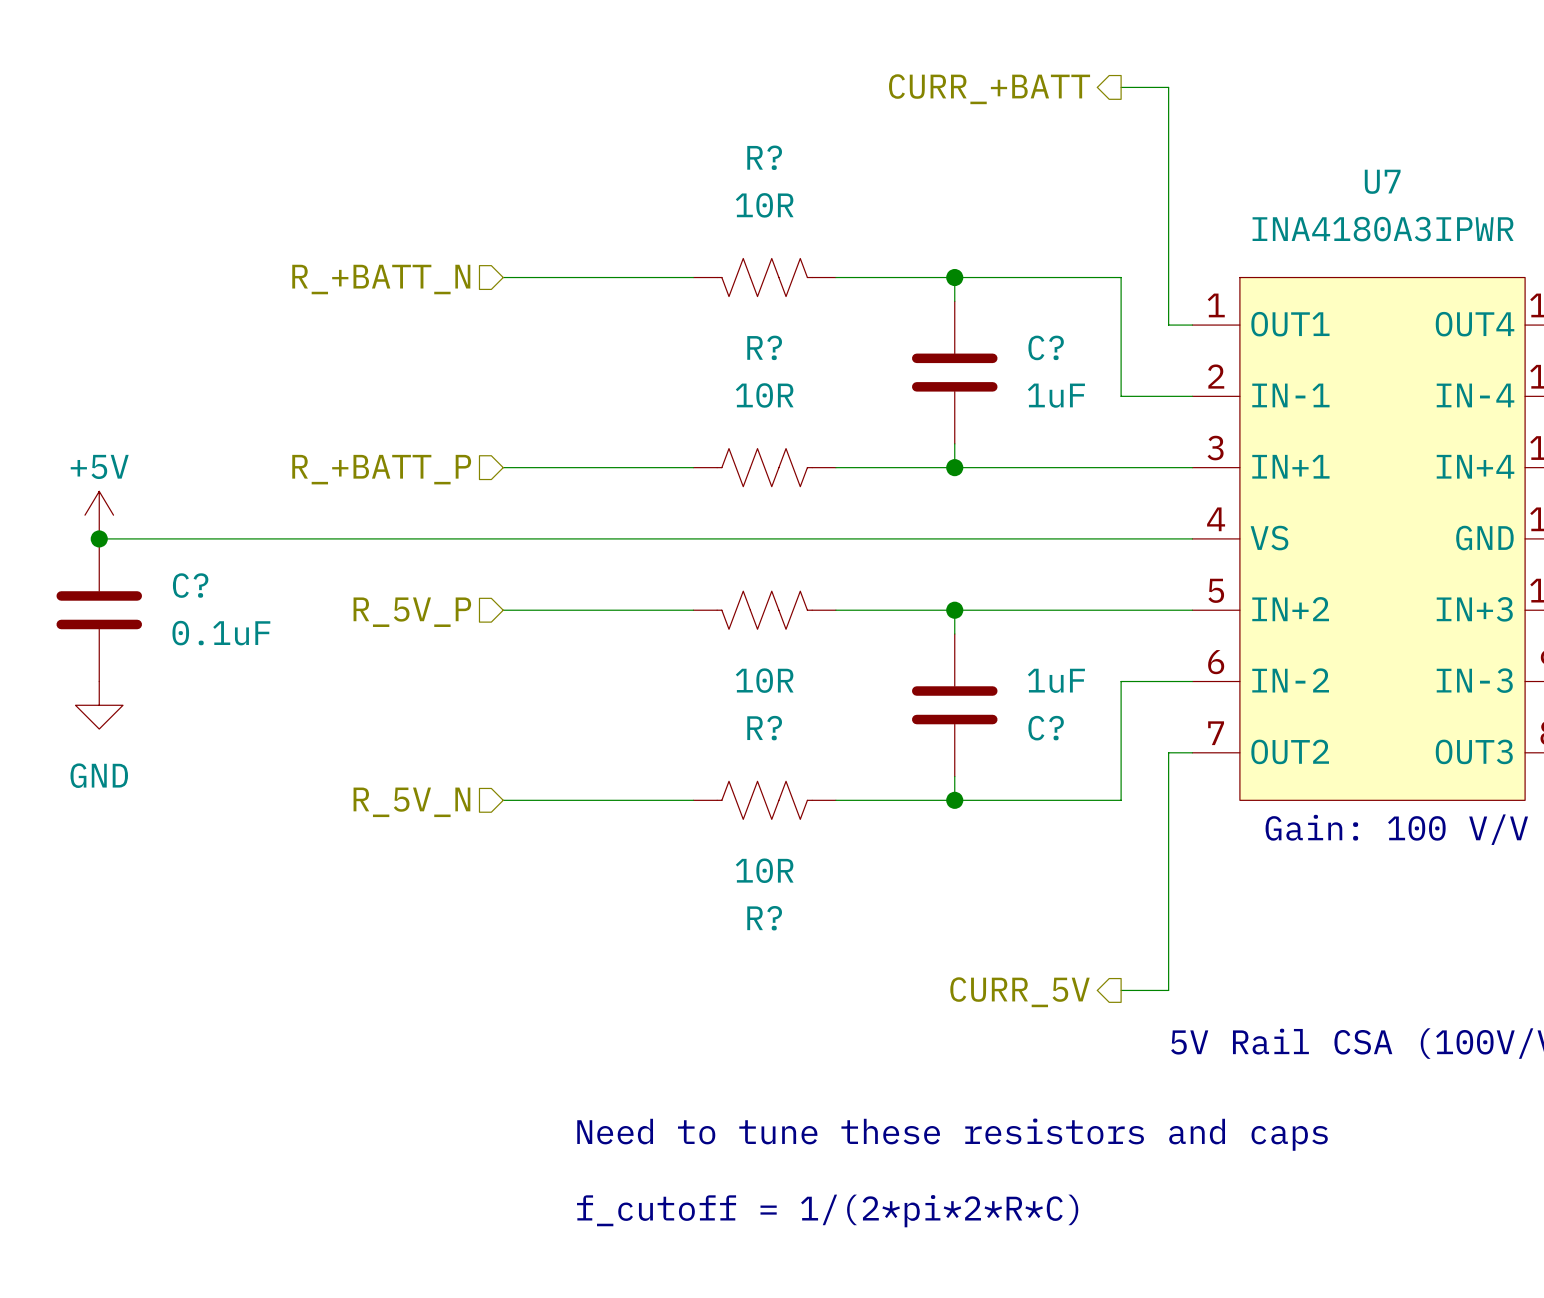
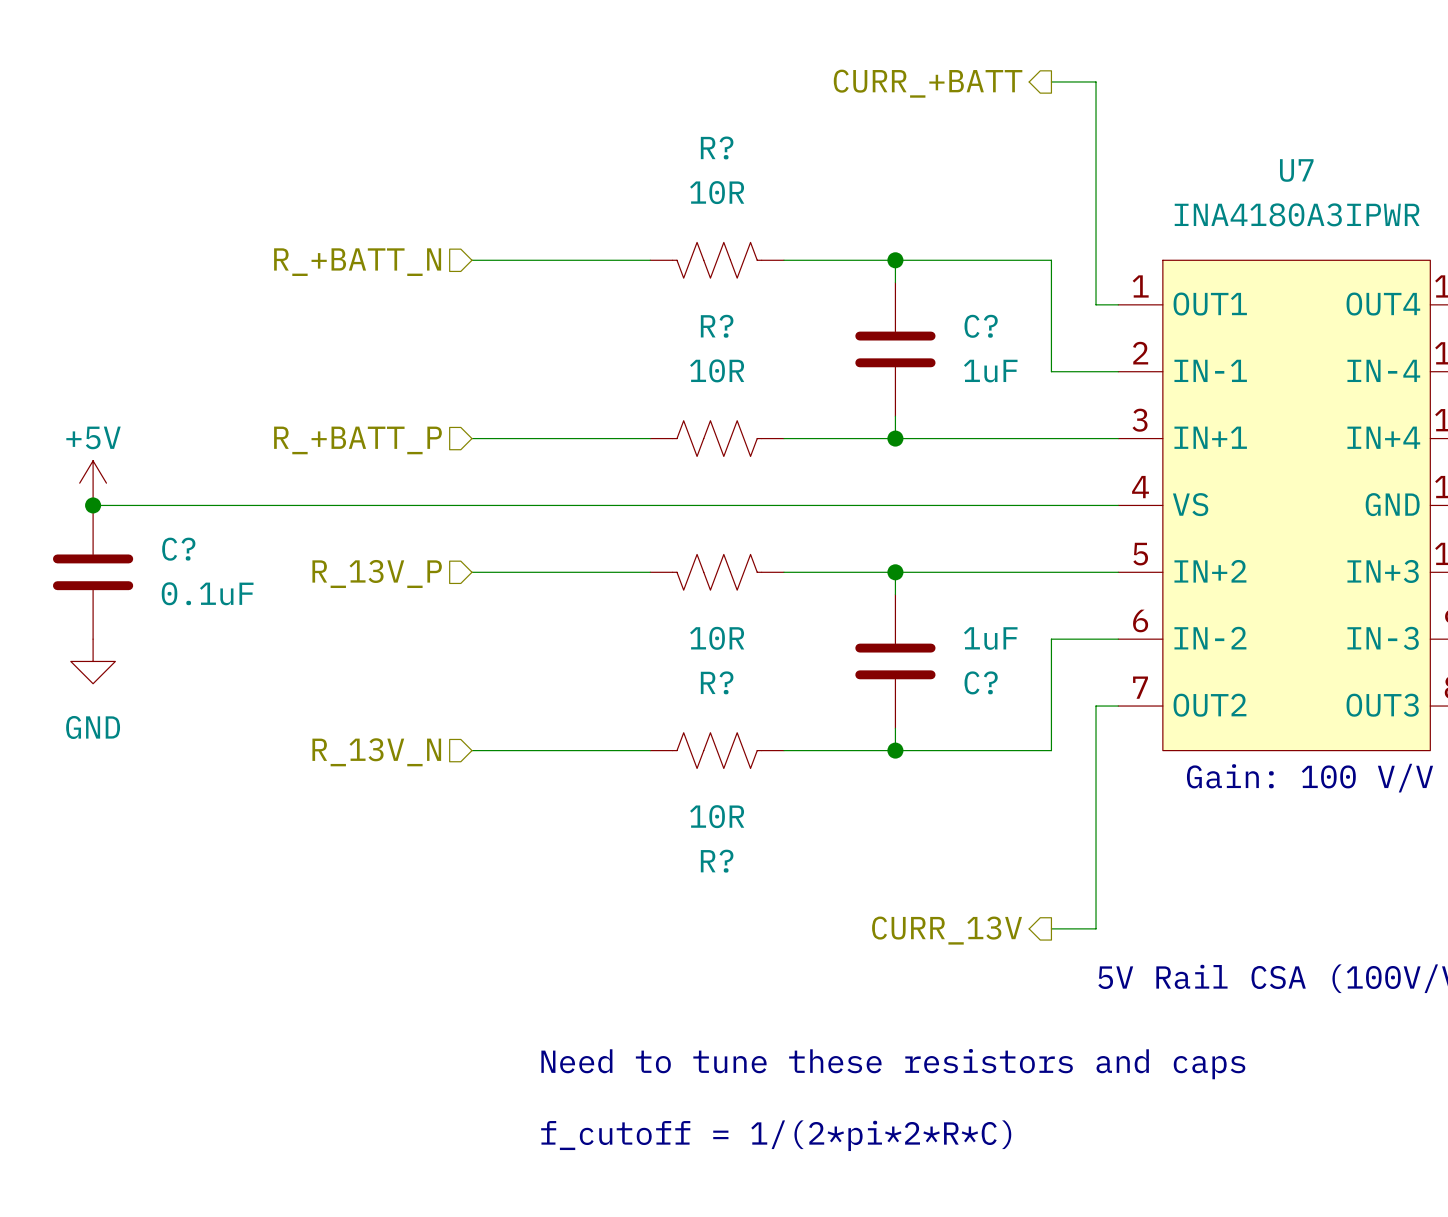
hierarchical label: R_5V_P (412, 612) -> R_13V_P (377, 573)
hierarchical label: R_5V_N (411, 802) -> R_13V_N (376, 752)
hierarchical label: CURR_5V (1020, 992) -> CURR_13V (947, 930)

